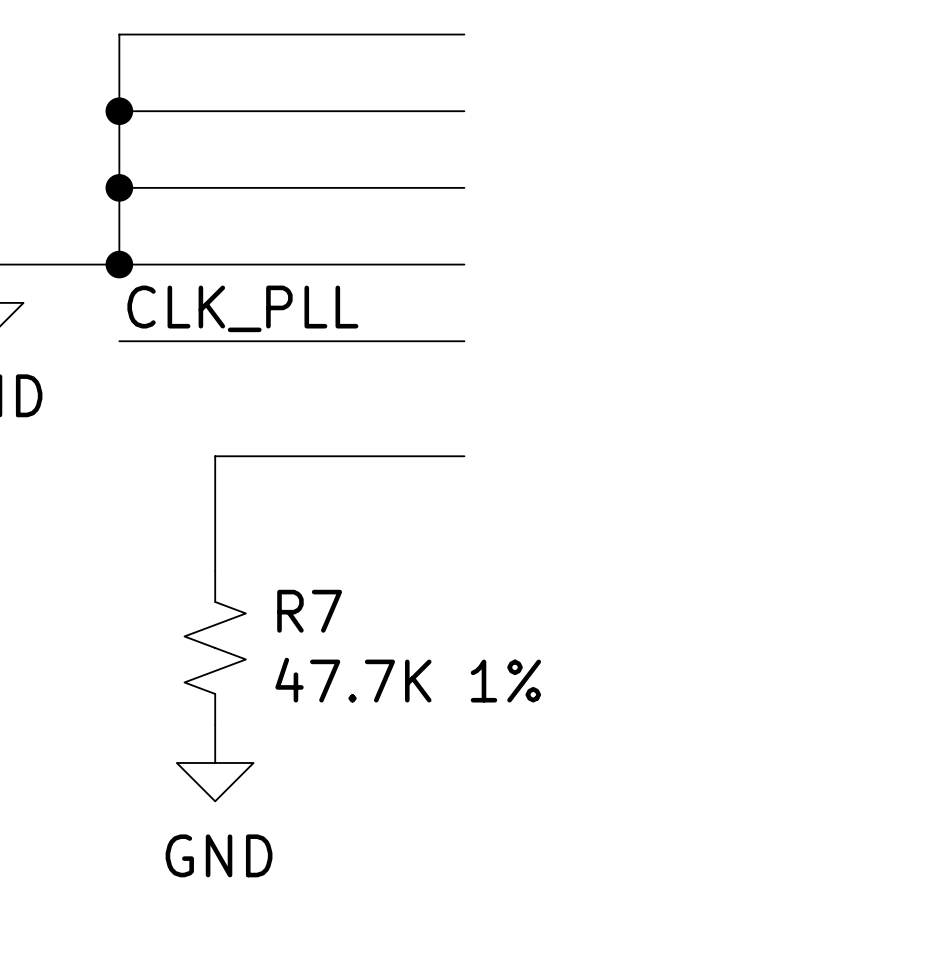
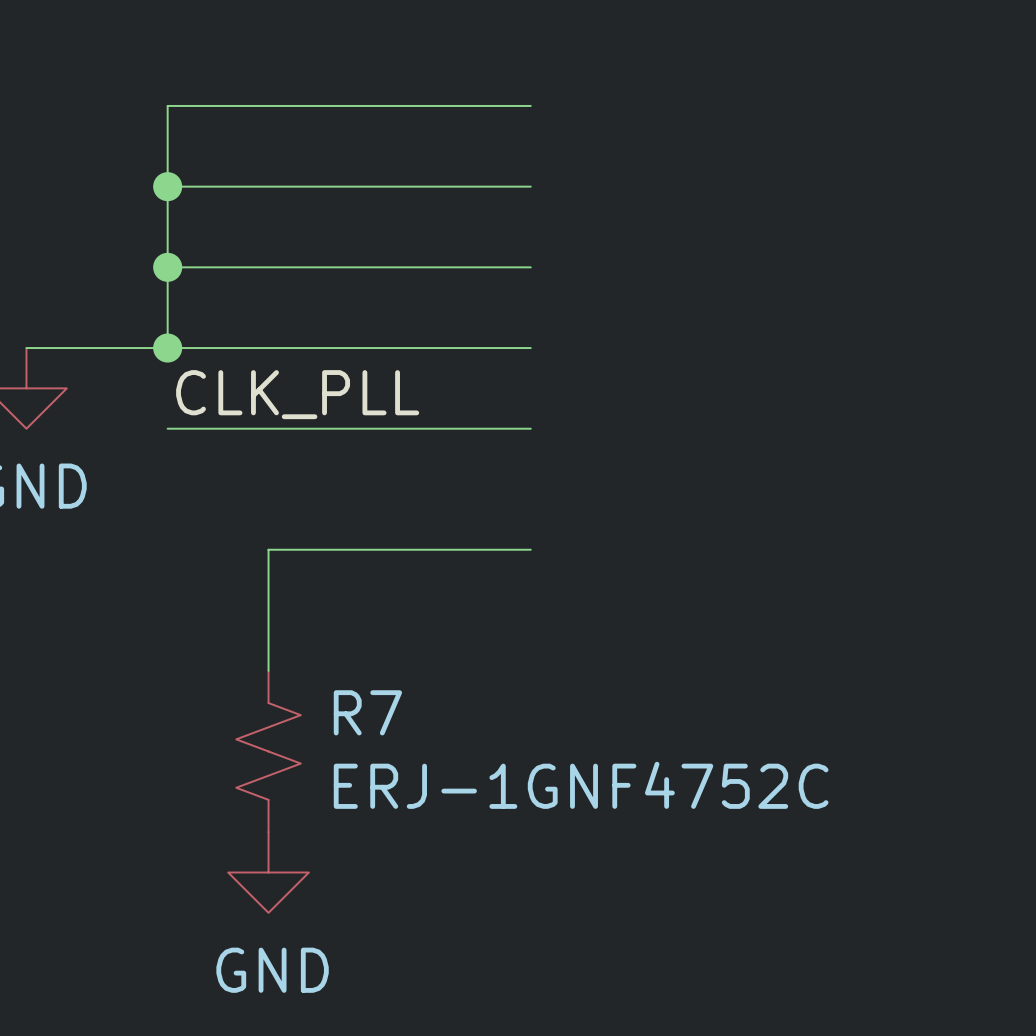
R7 value: 47.7K 1% (408, 680) -> ERJ-1GNF4752C (581, 785)

